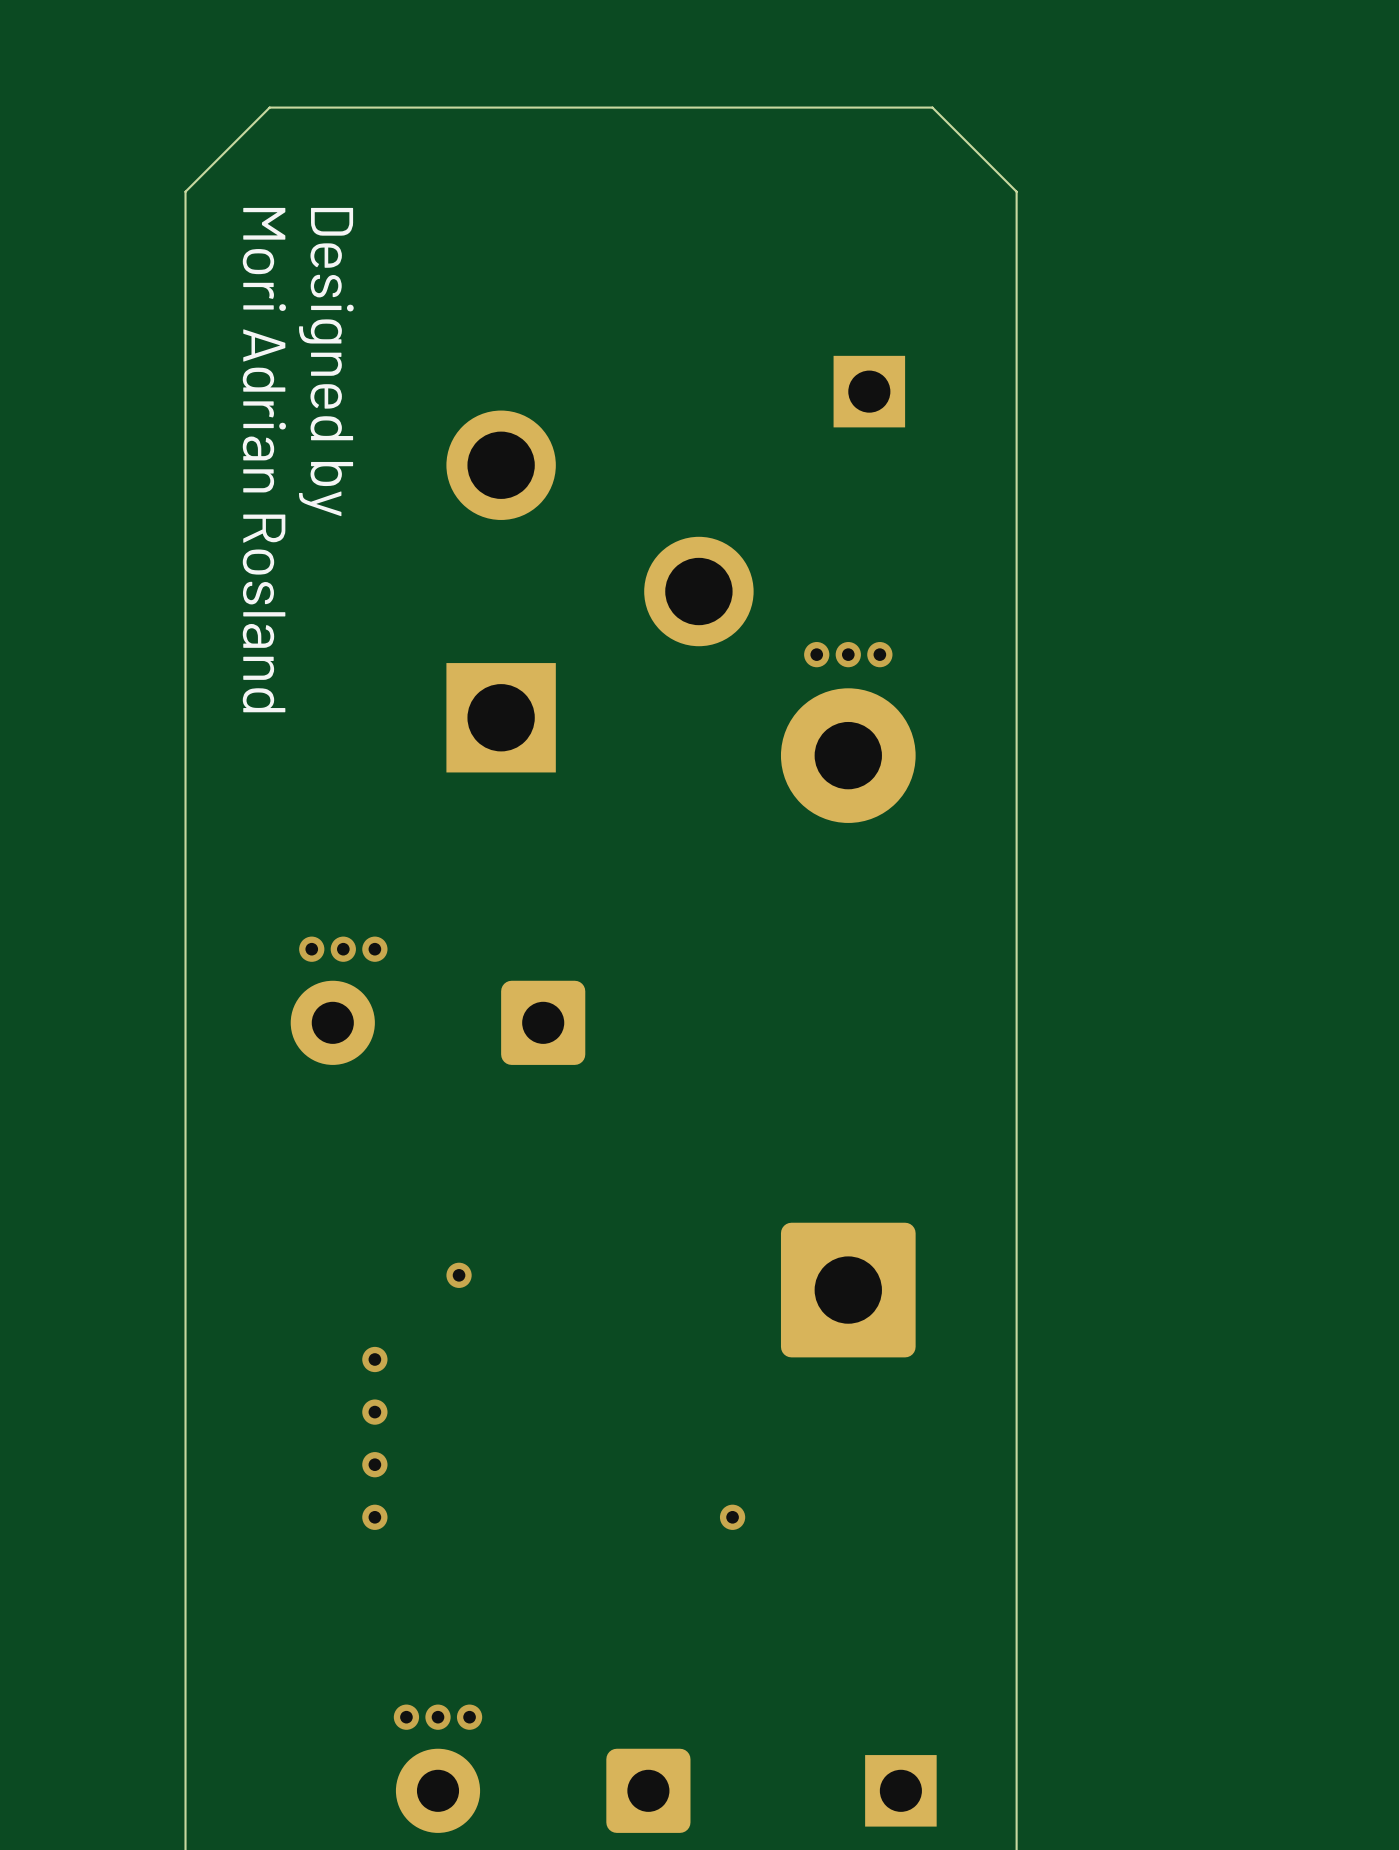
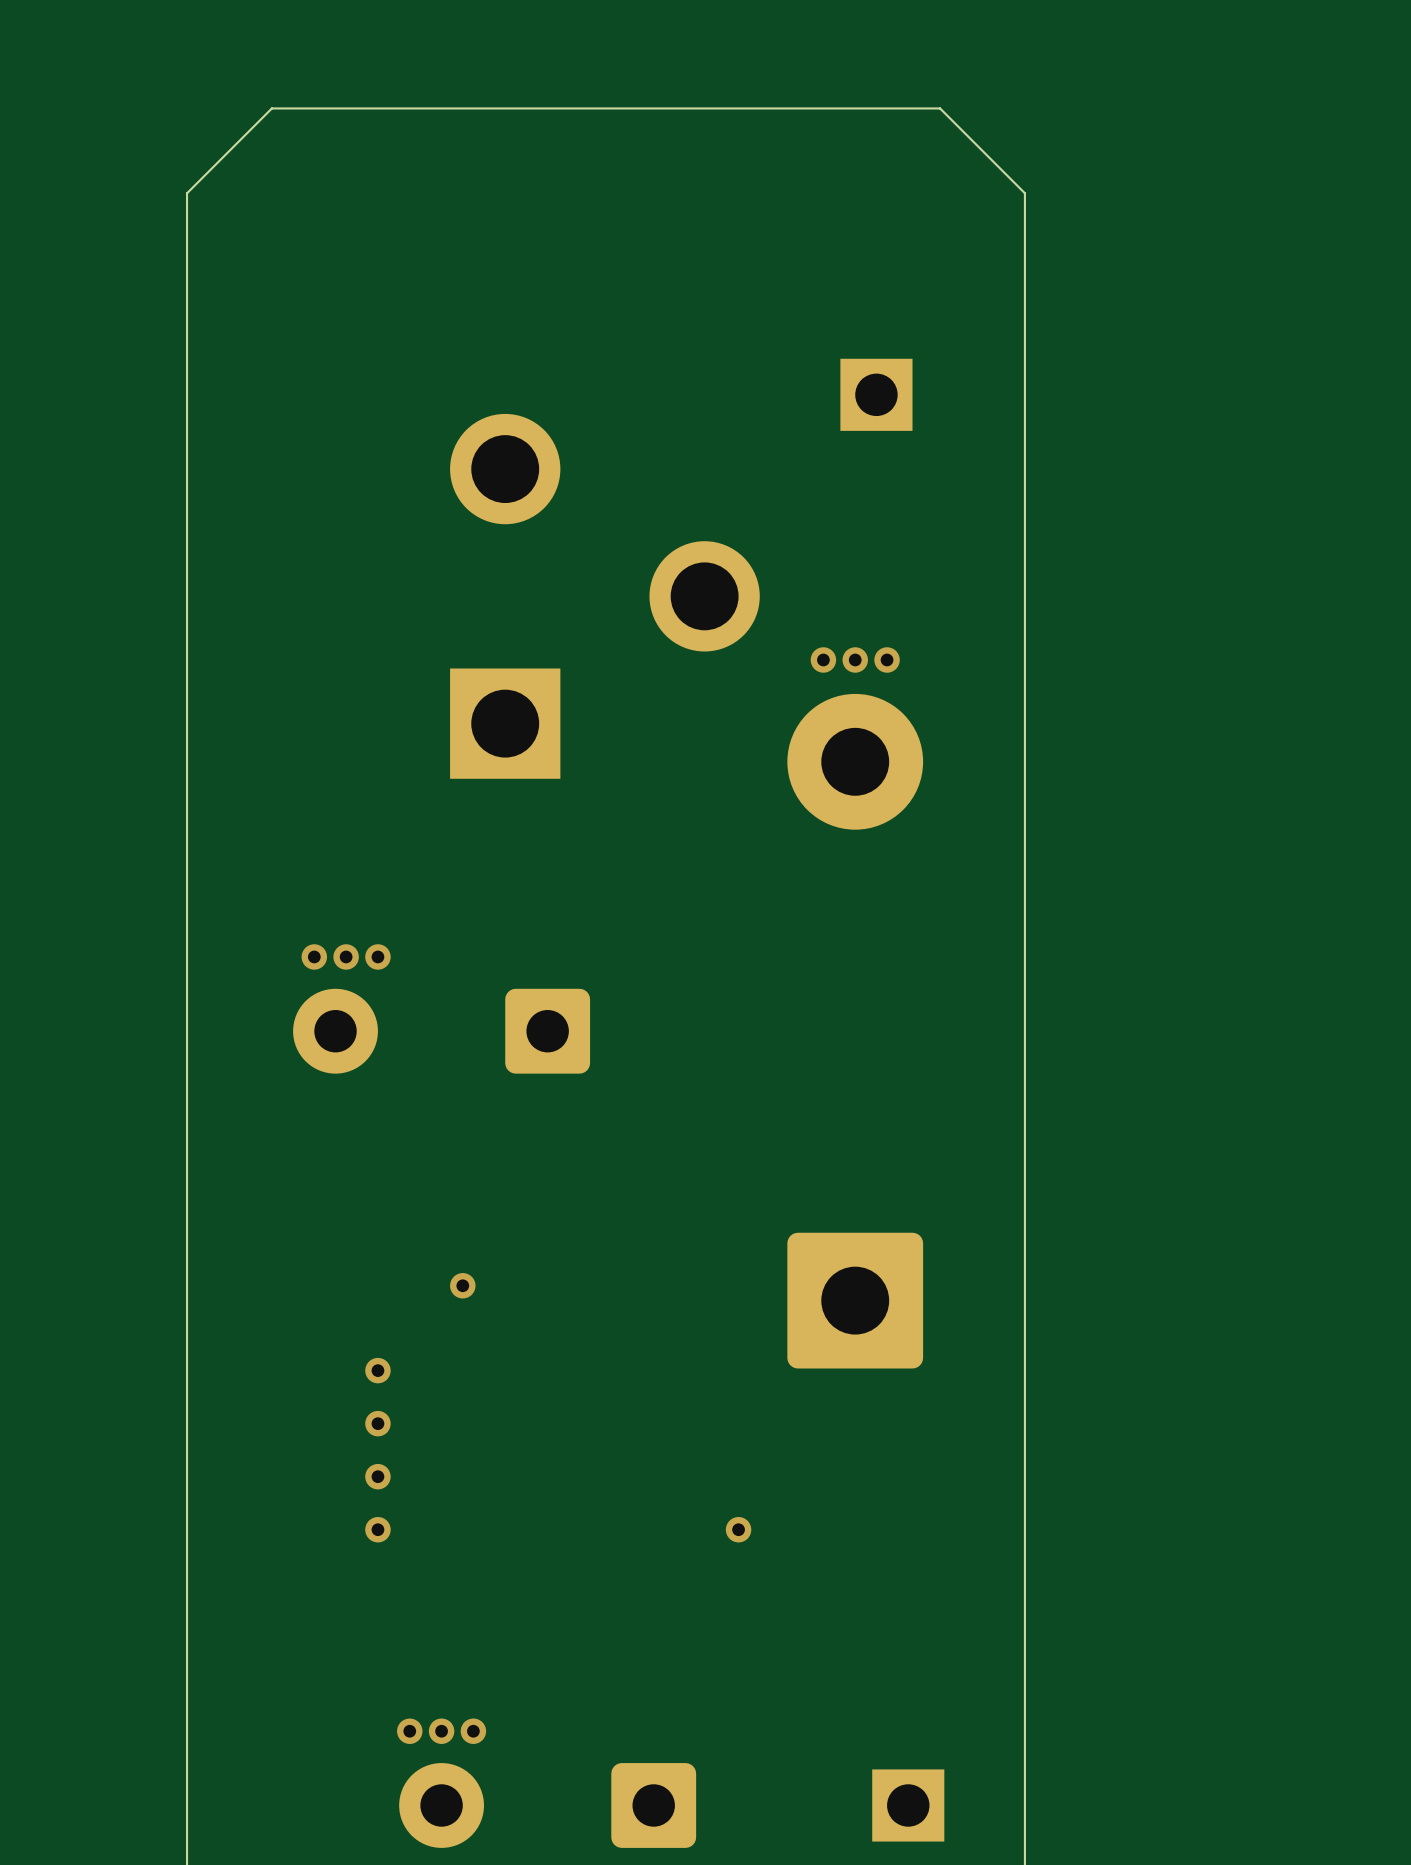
text: Designed by (326, 362) -> none
text: Mori Adrian Rosland (264, 460) -> none

